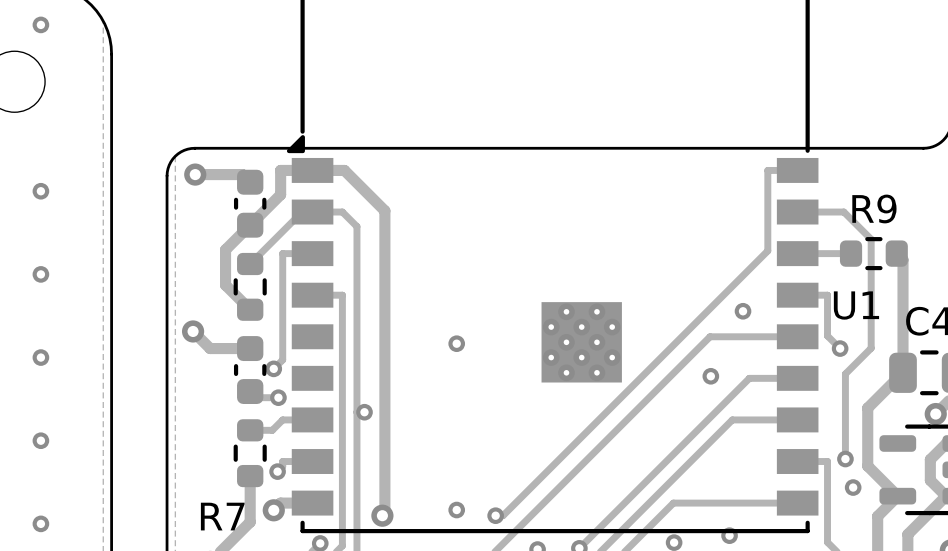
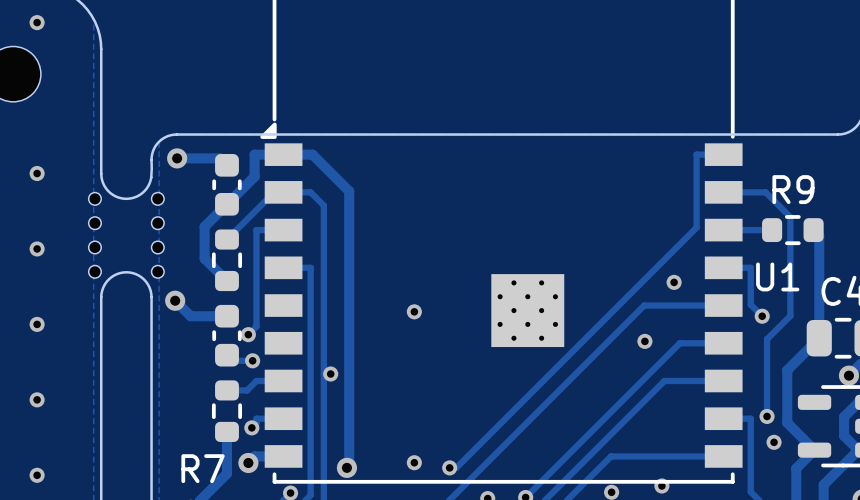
board edge: (194, 148) (184, 150) (175, 156) (167, 172) (167, 327) -> (176, 134) (165, 136) (155, 146) (151, 156) (149, 183) (144, 191) (136, 196) (124, 198) (112, 194) (104, 185) (101, 173)
board edge: (111, 191) (111, 327) -> (151, 296) (149, 287) (144, 279) (135, 274) (126, 272) (116, 274) (108, 279) (103, 287) (101, 296)
part: none -> (94, 198)
part: none -> (157, 198)
part: none -> (94, 223)
part: none -> (157, 223)
part: none -> (94, 247)
part: none -> (157, 247)
part: none -> (94, 271)
part: none -> (157, 271)

